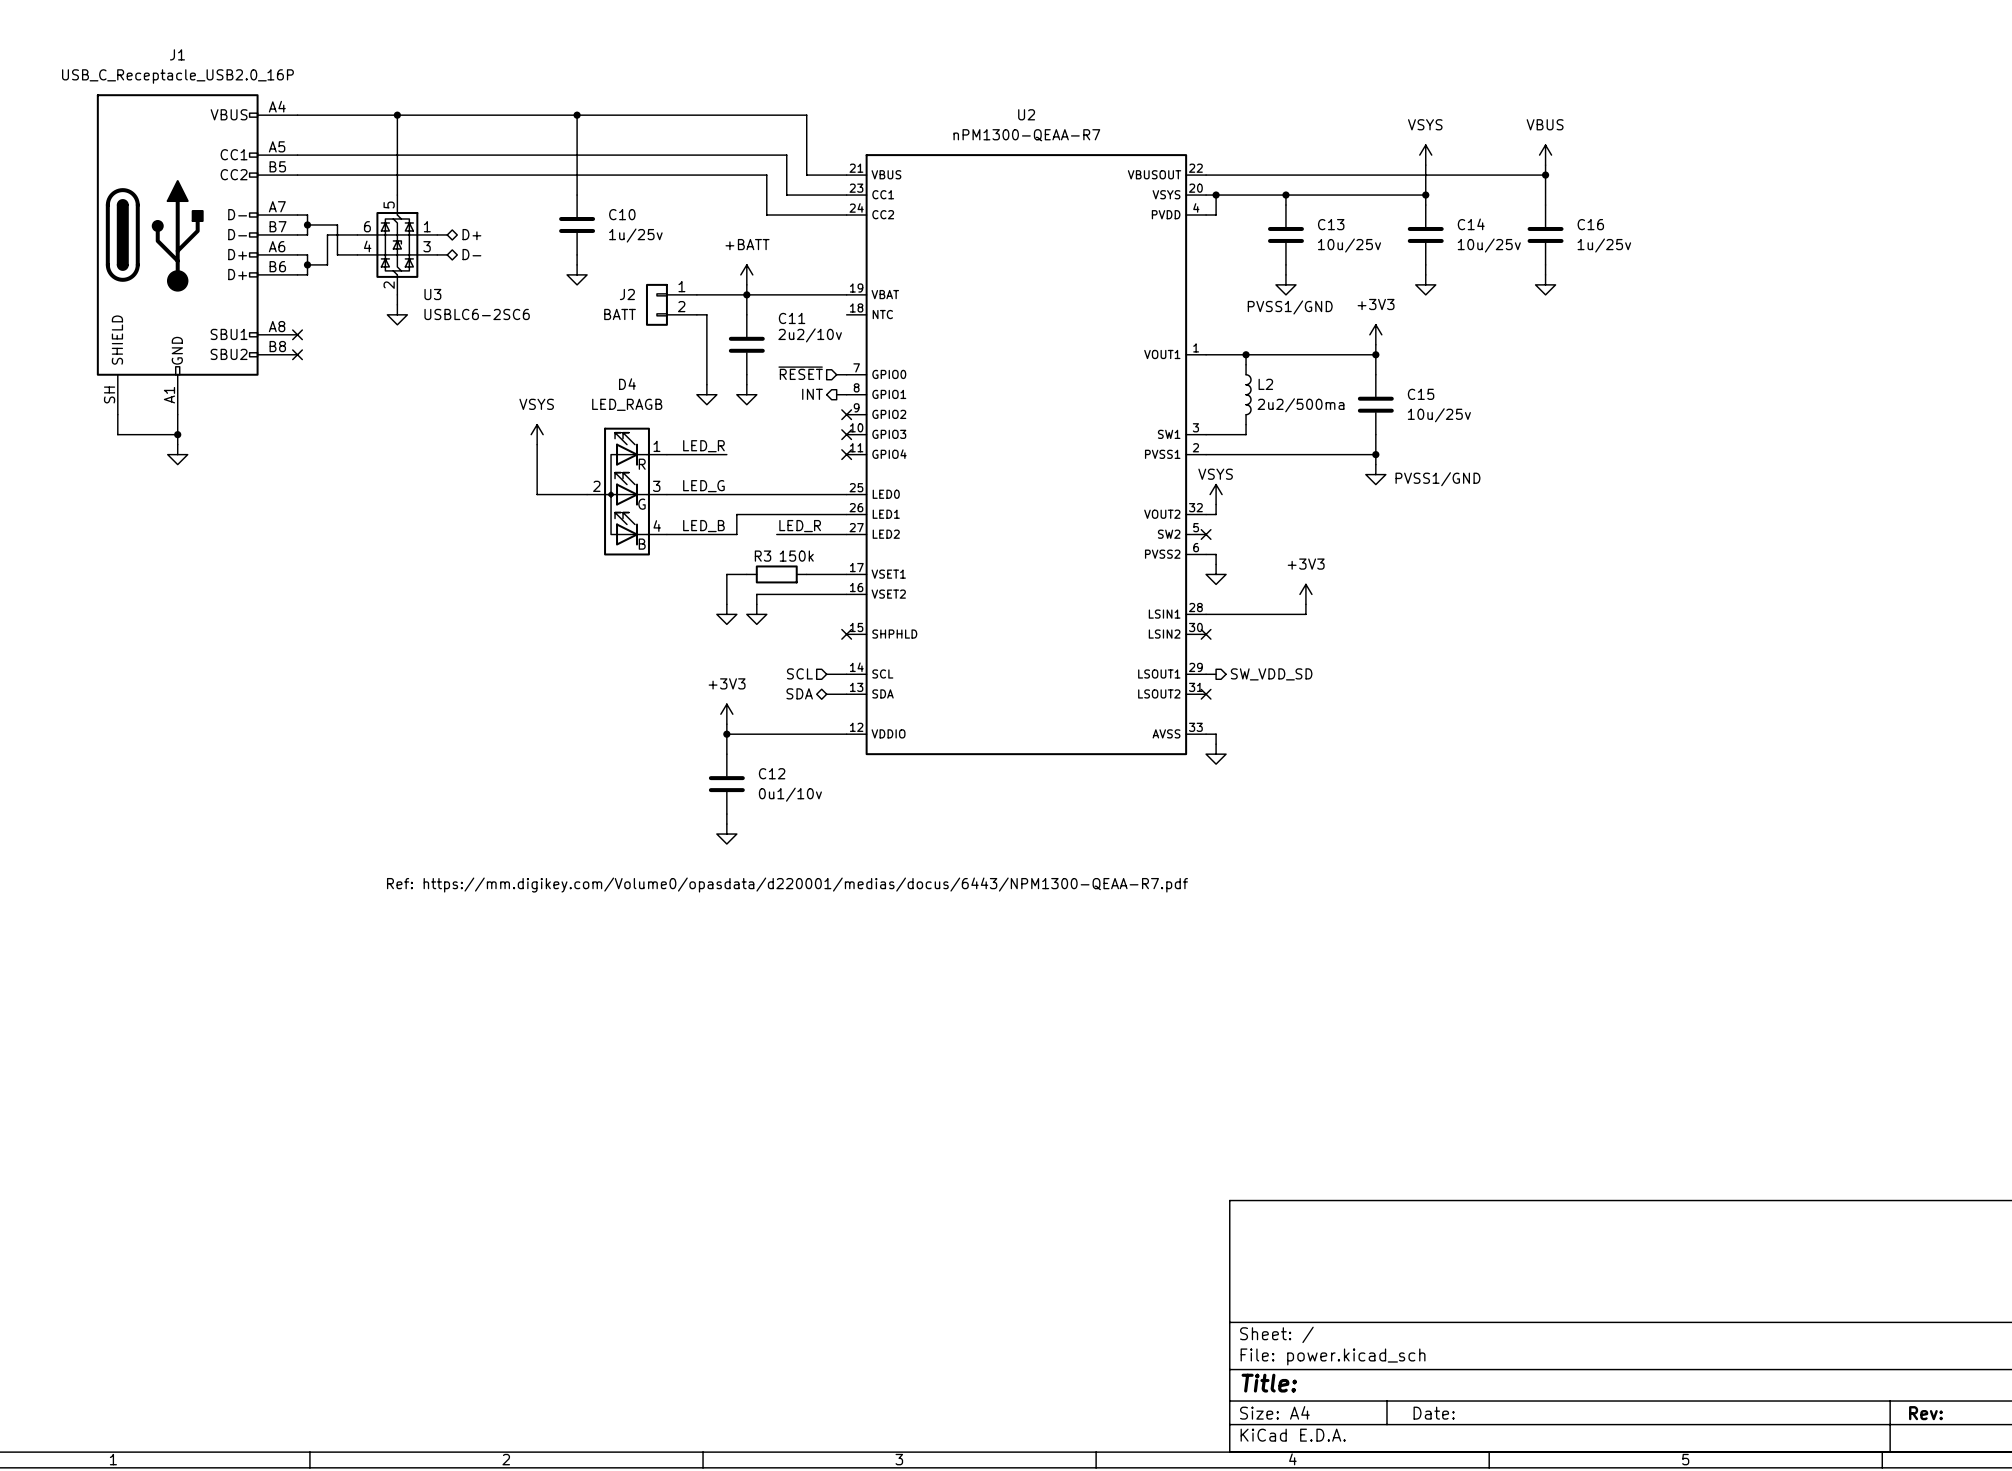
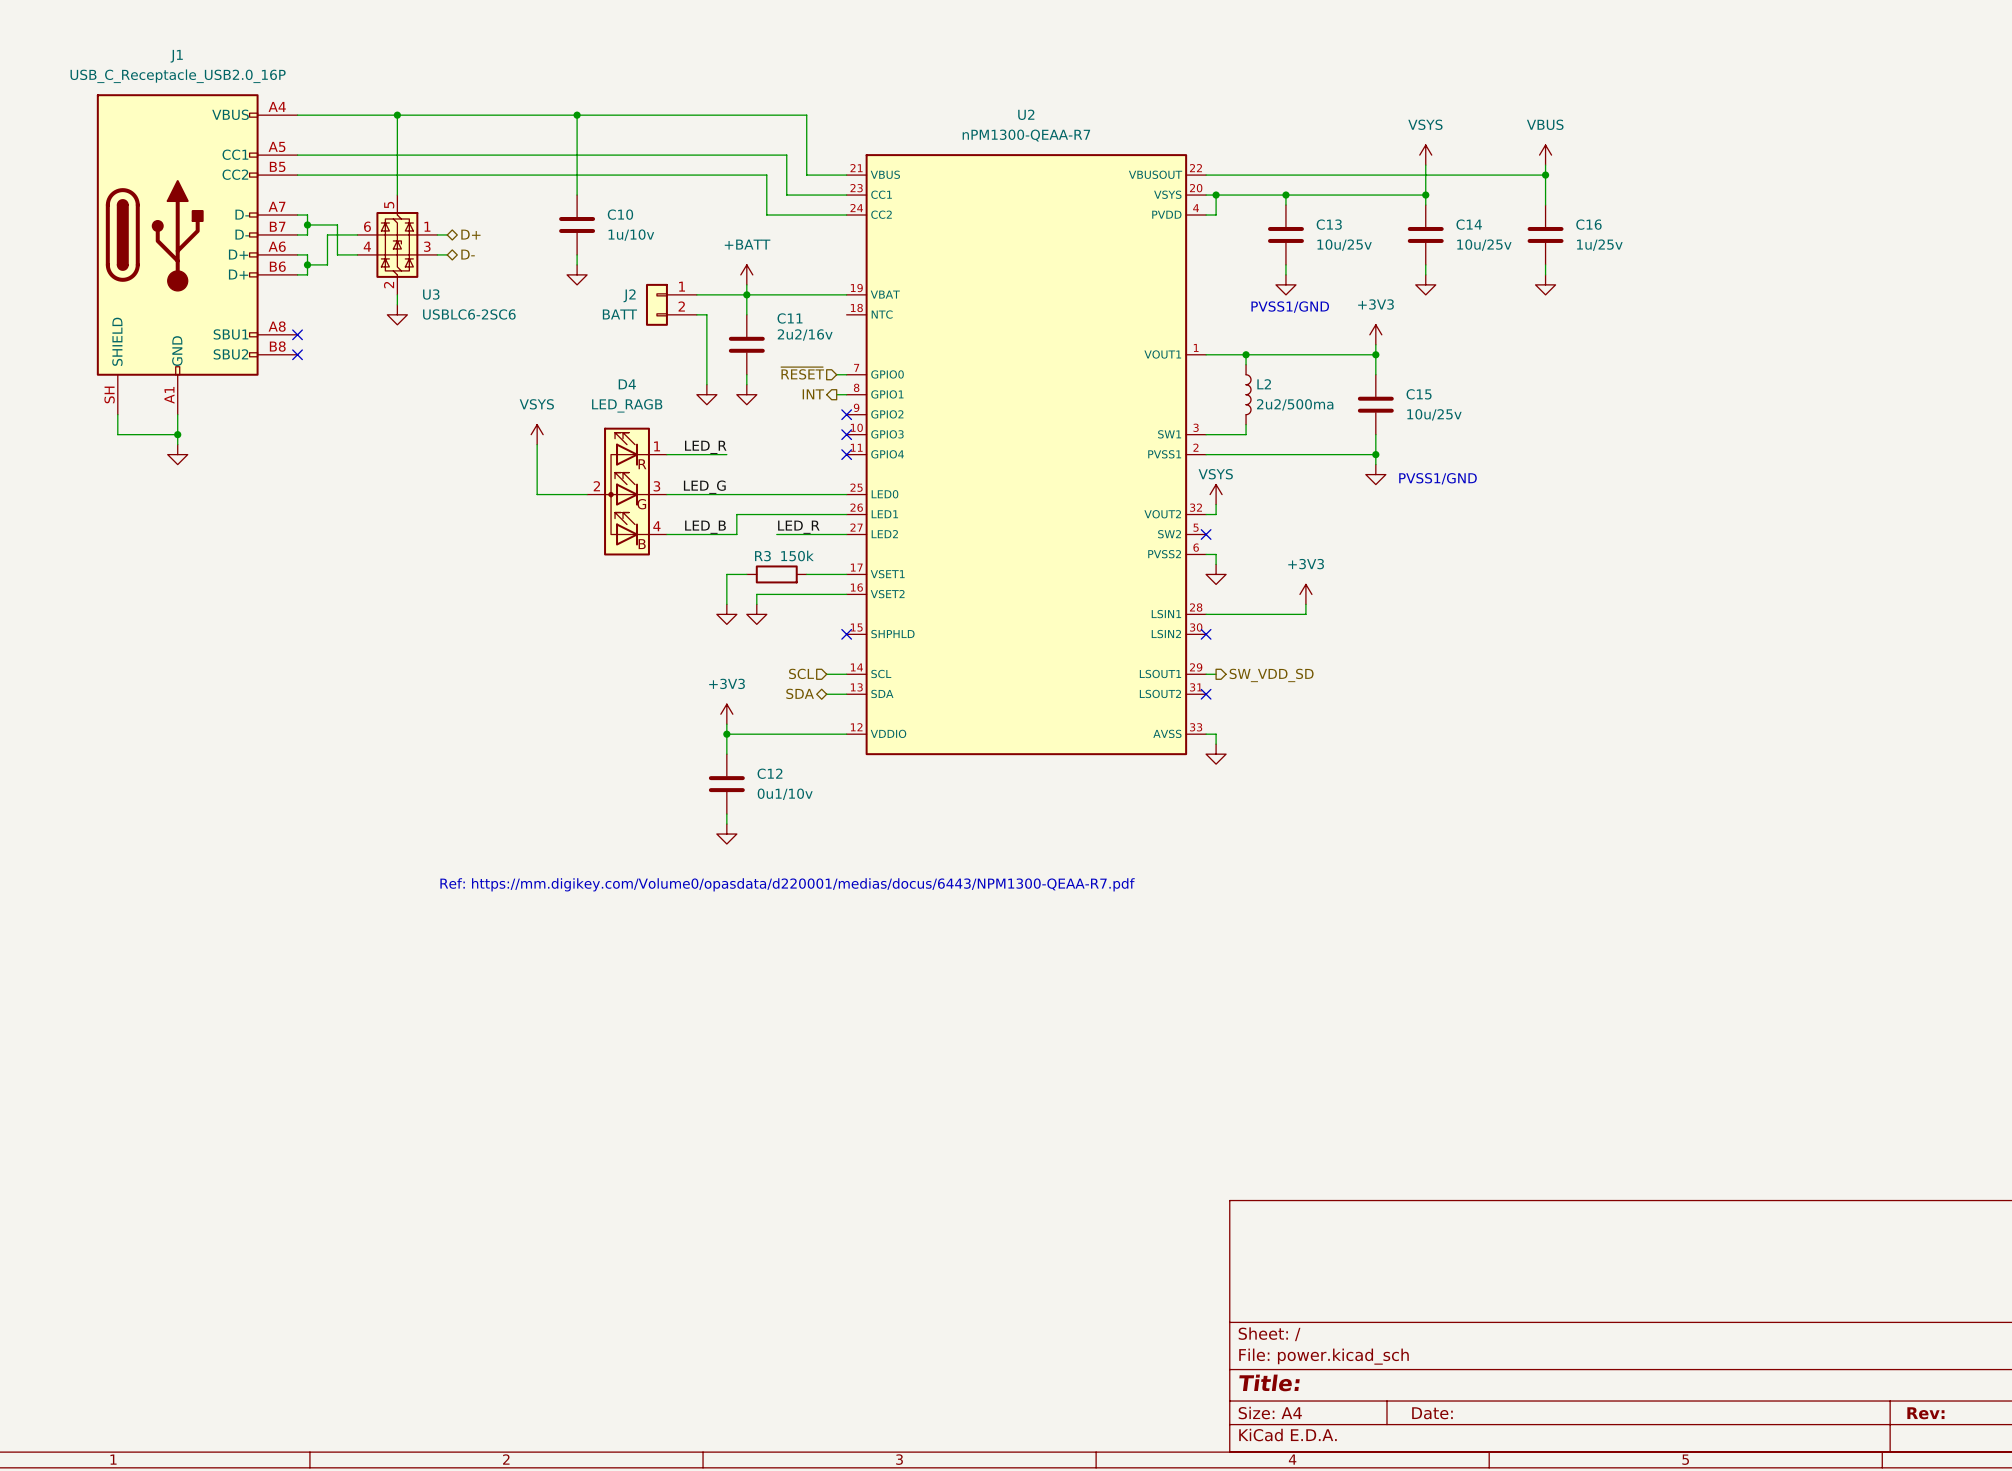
C10 value: 1u/25v (635, 235) -> 1u/10v (631, 235)
C11 value: 2u2/10v (810, 335) -> 2u2/16v (805, 334)

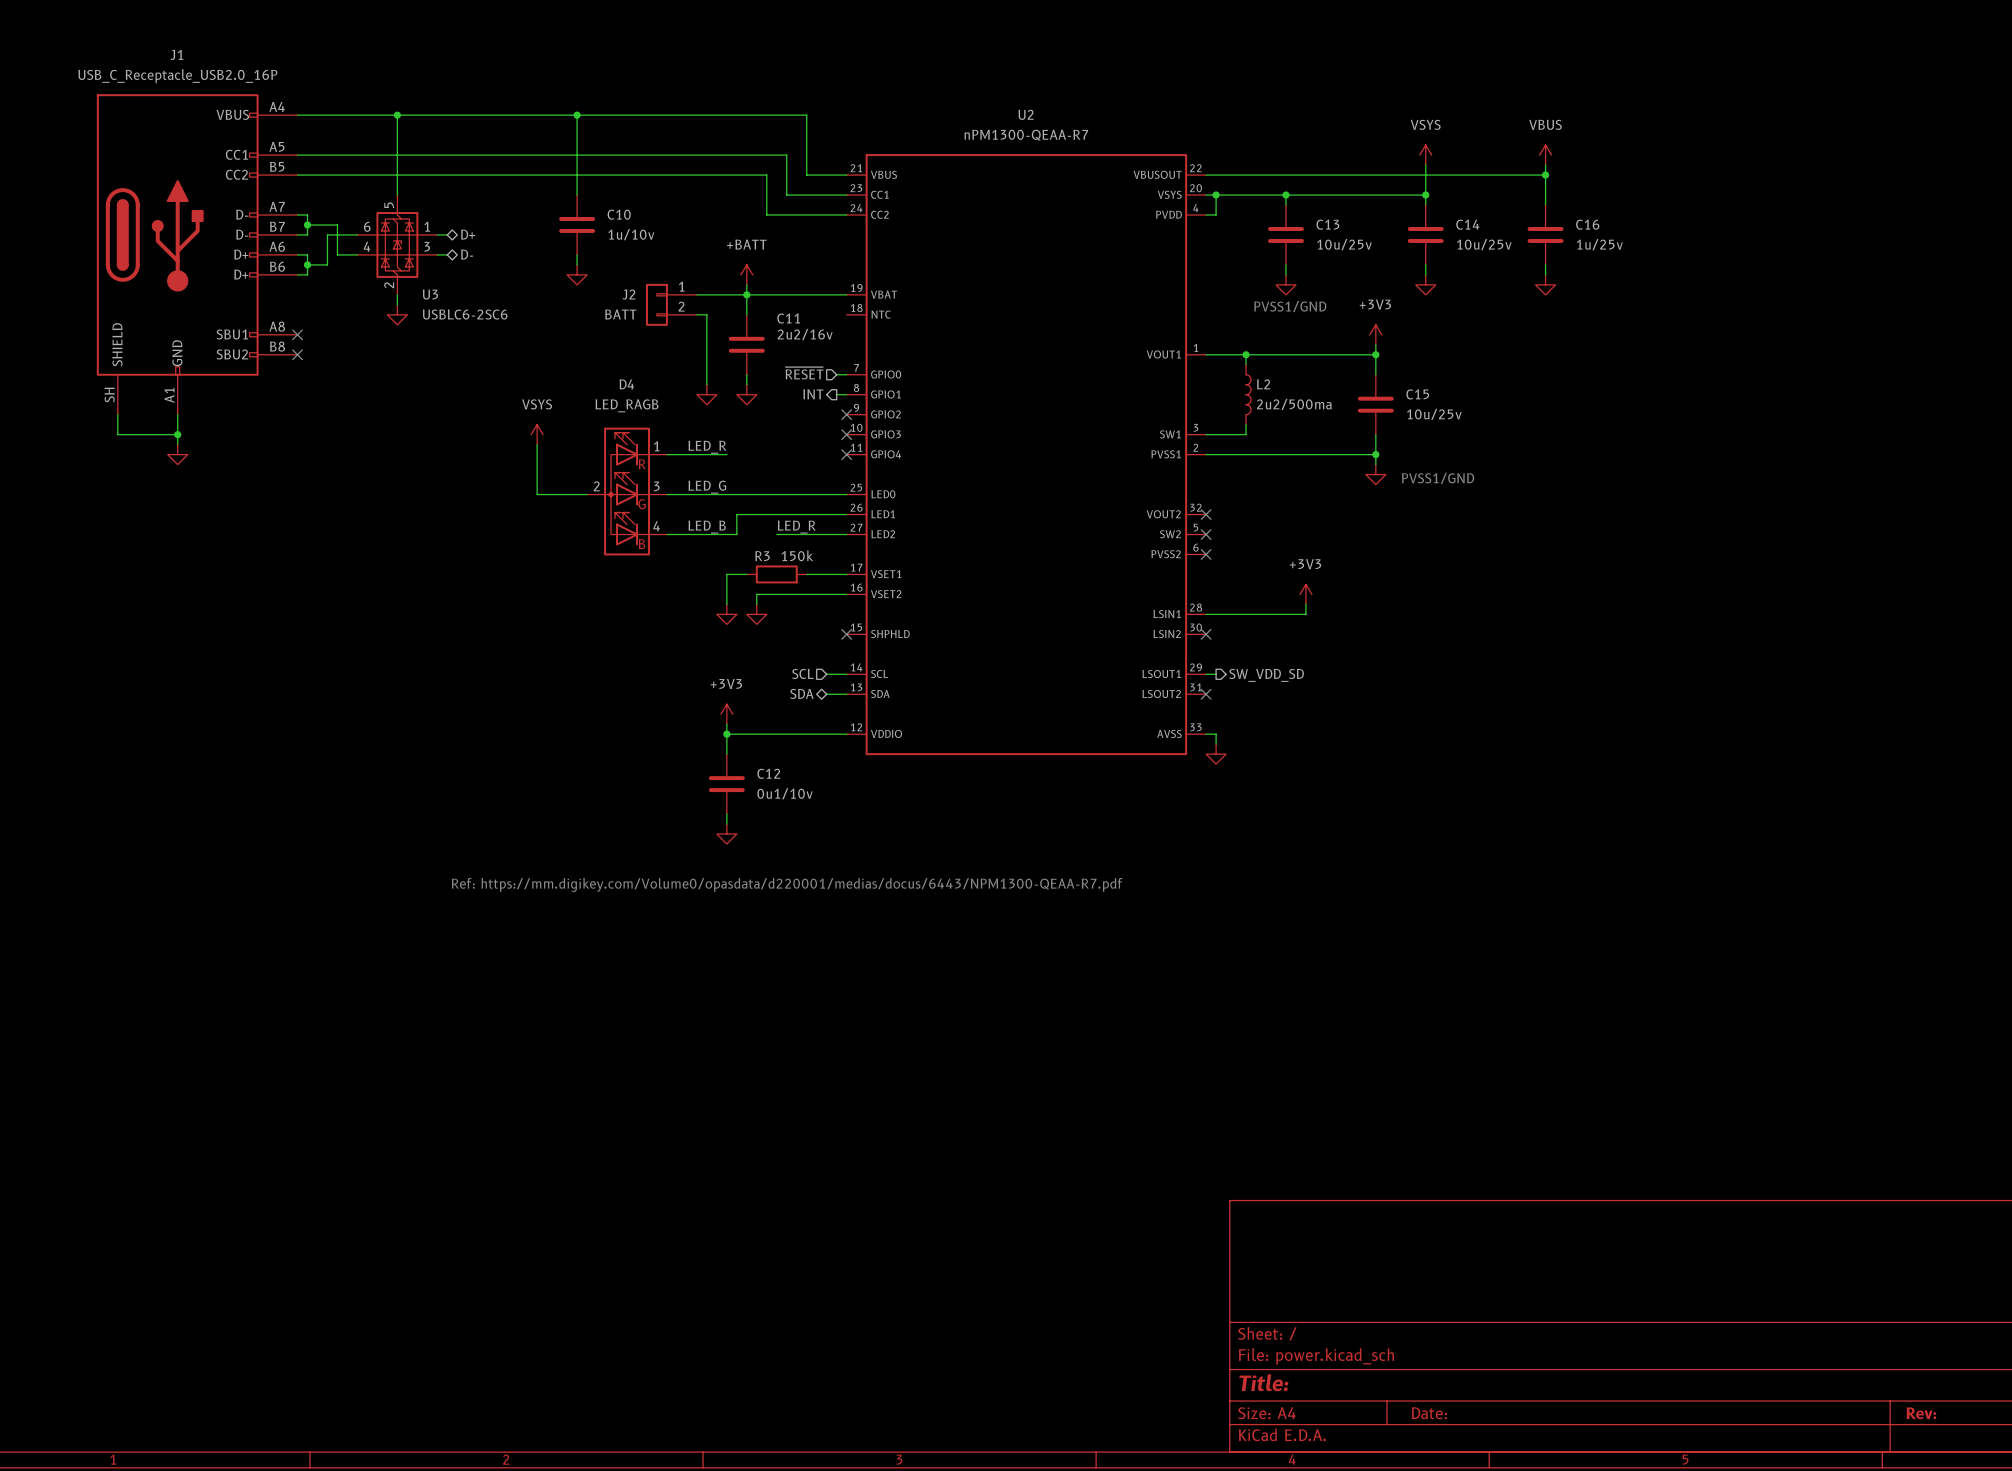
power symbol: VSYS (1216, 494) -> none
wire: (1216, 504) (1216, 514) (1206, 514) -> none
no-connect mark: none -> (1206, 514)
wire: (1206, 554) (1216, 554) (1216, 564) -> none
no-connect mark: none -> (1206, 554)
power symbol: (1216, 574) -> none

